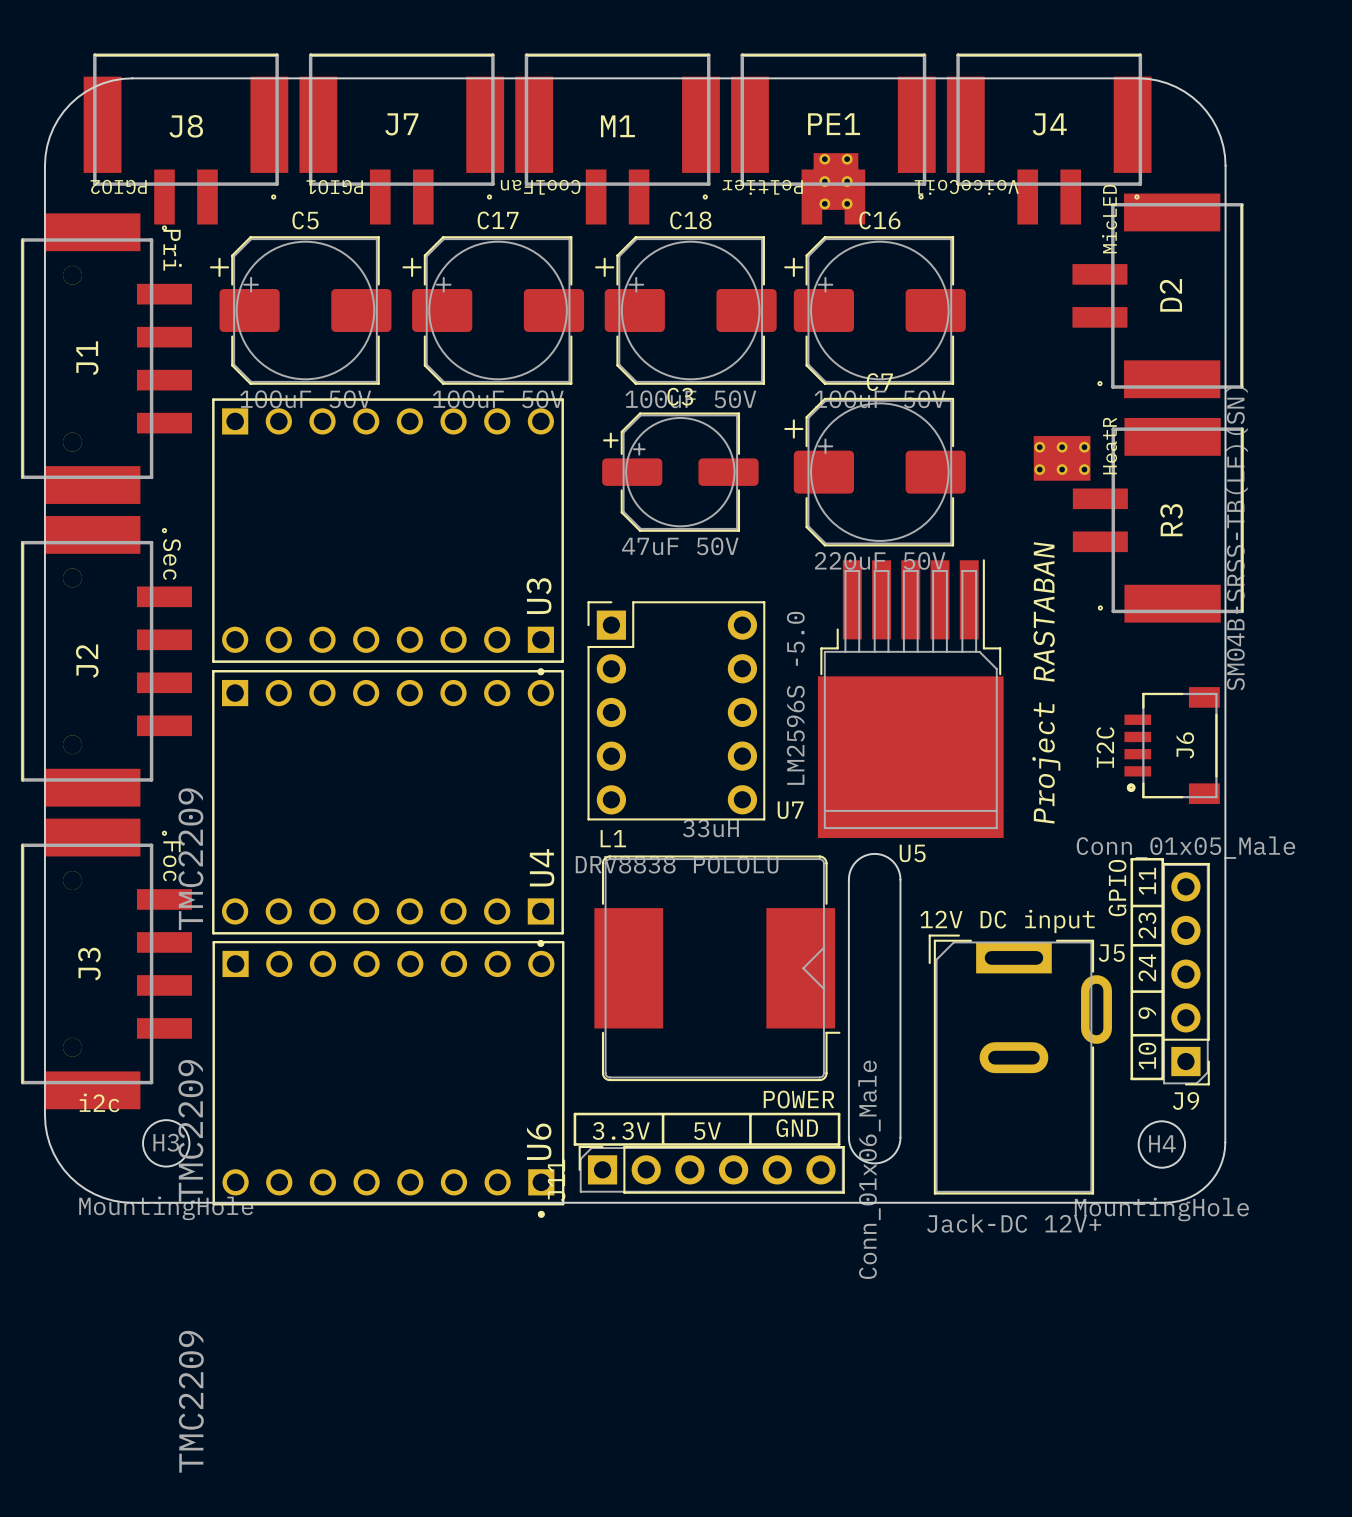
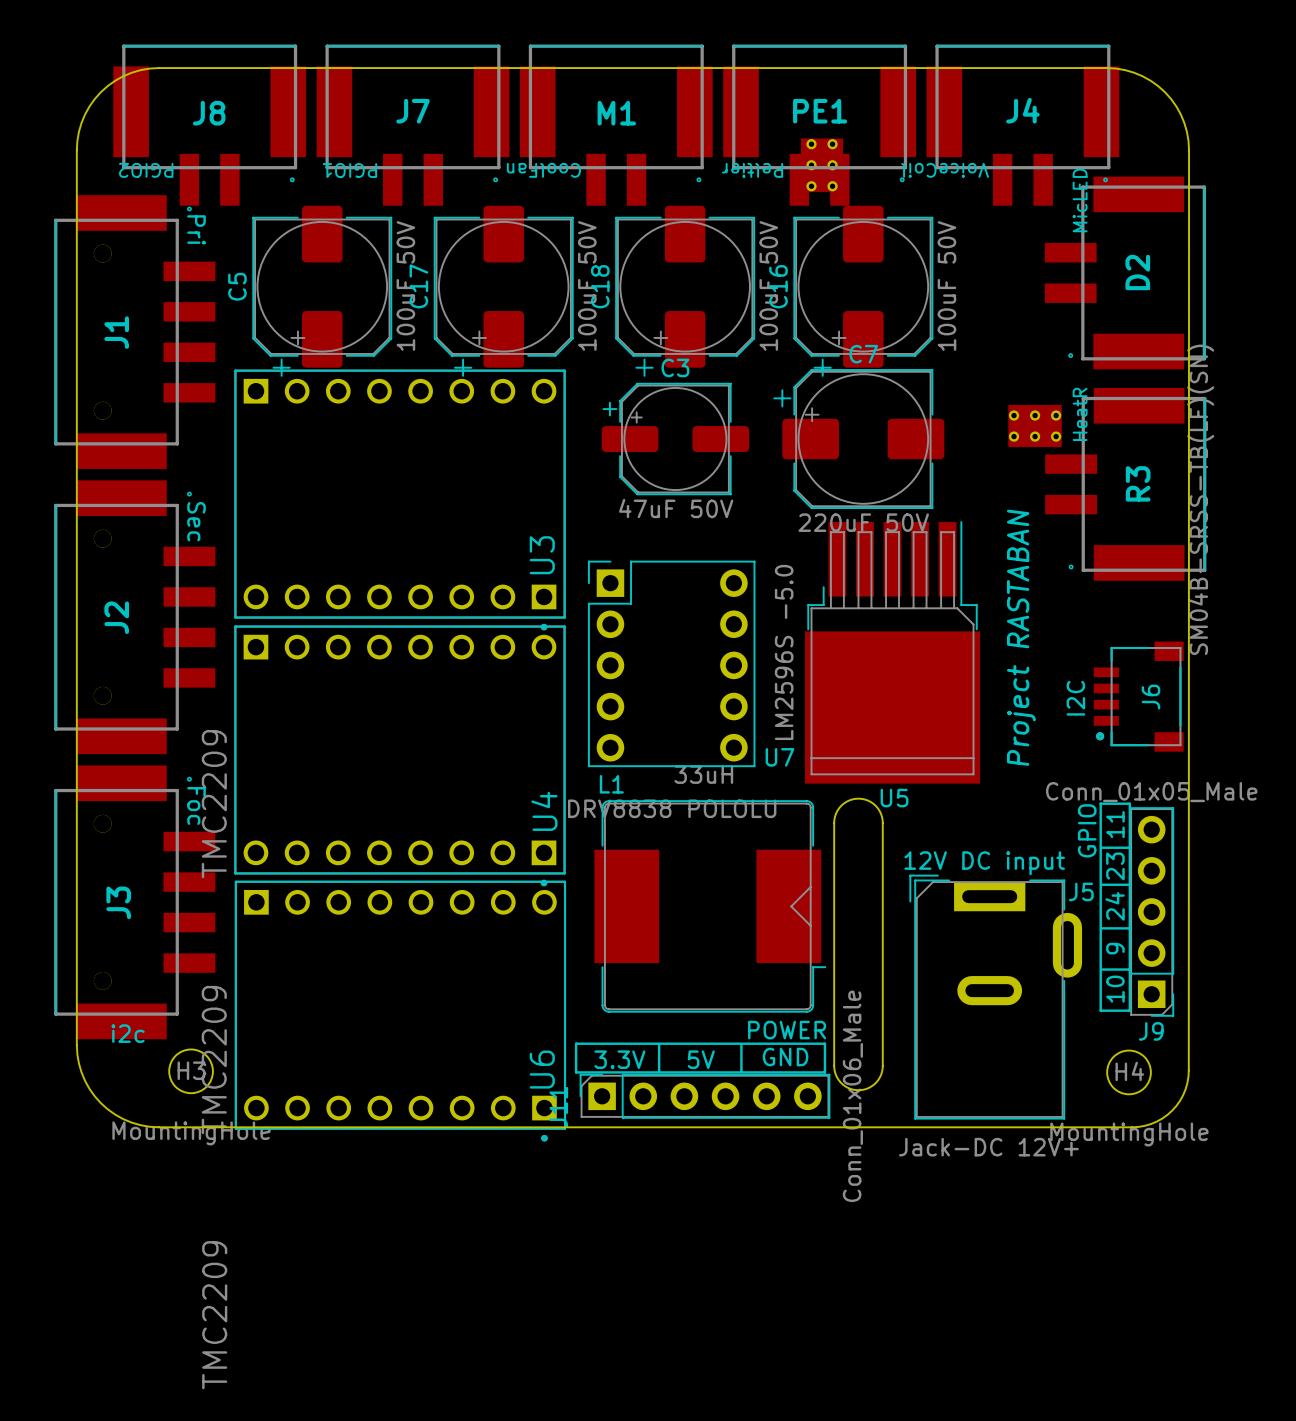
C5 rotation: 0° (300, 310) -> 90° counterclockwise (322, 291)
C17 rotation: 0° (493, 310) -> 90° counterclockwise (503, 291)
C18 rotation: 0° (685, 310) -> 90° counterclockwise (685, 291)
C16 rotation: 0° (875, 310) -> 90° counterclockwise (863, 291)

